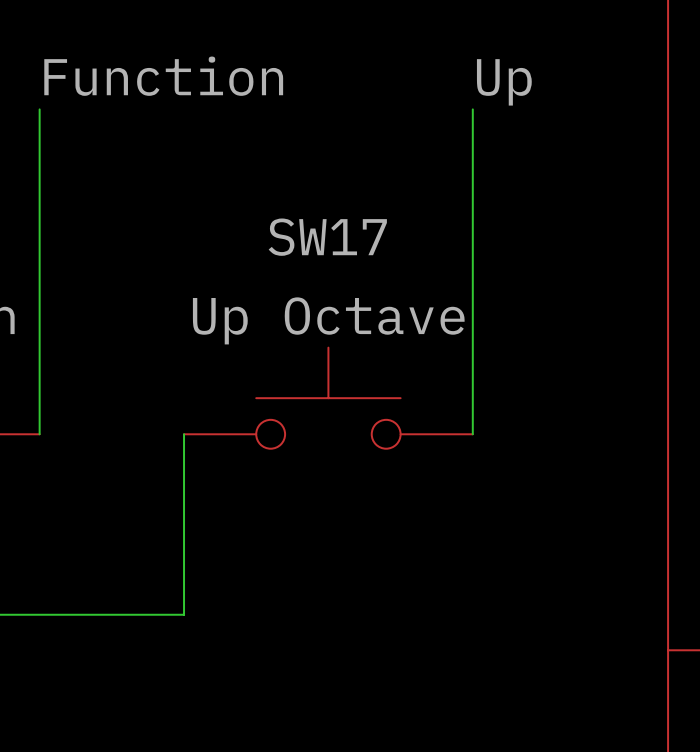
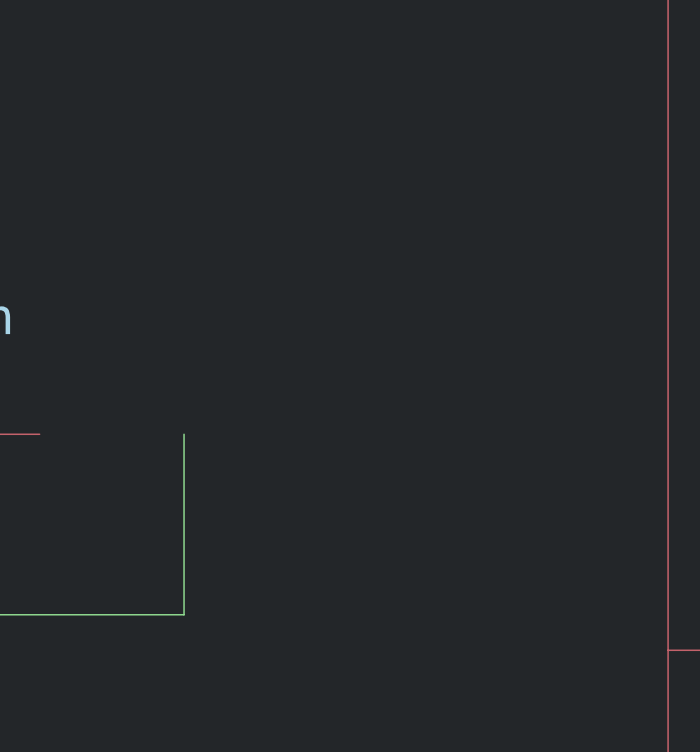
label: Function (163, 76) -> none
label: Up (504, 82) -> none
wire: (39, 109) (39, 434) -> none
wire: (472, 109) (472, 434) -> none
SW17: Up Octave (328, 398) -> none

